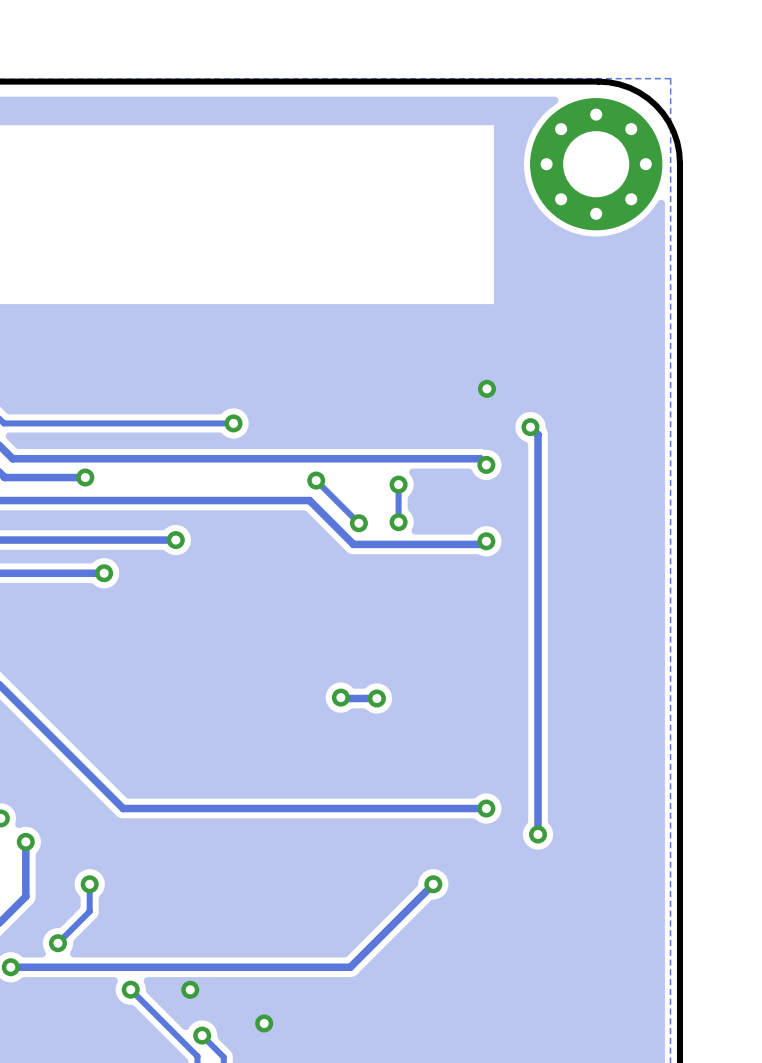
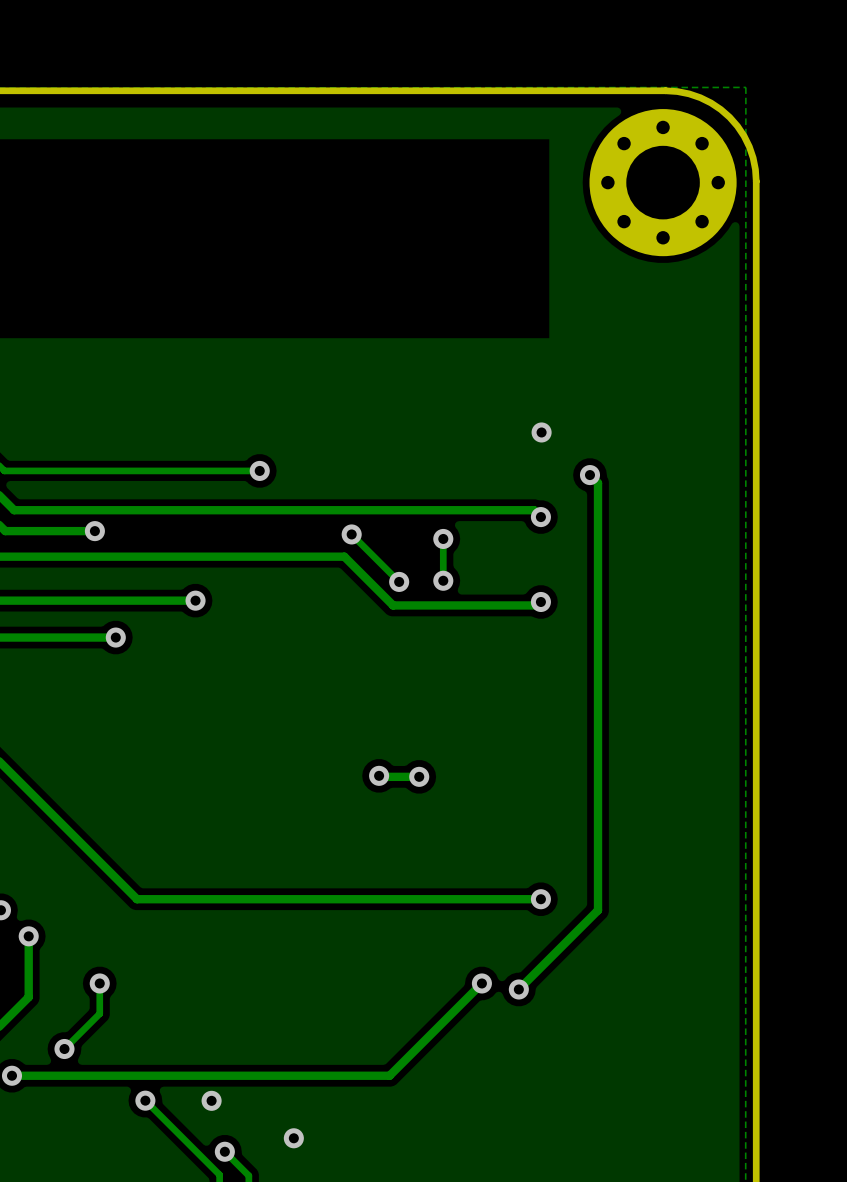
track: (538, 434) (538, 834) -> (598, 483) (598, 910) (518, 989)
via position: (538, 834) -> (518, 989)

